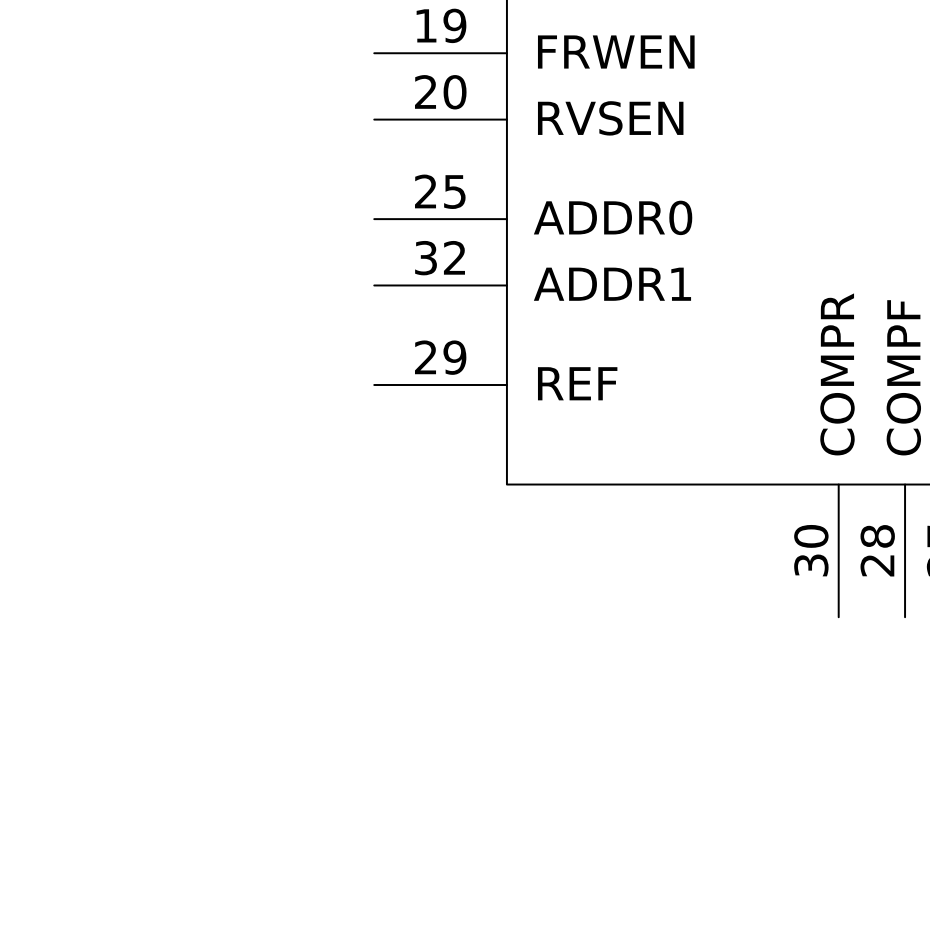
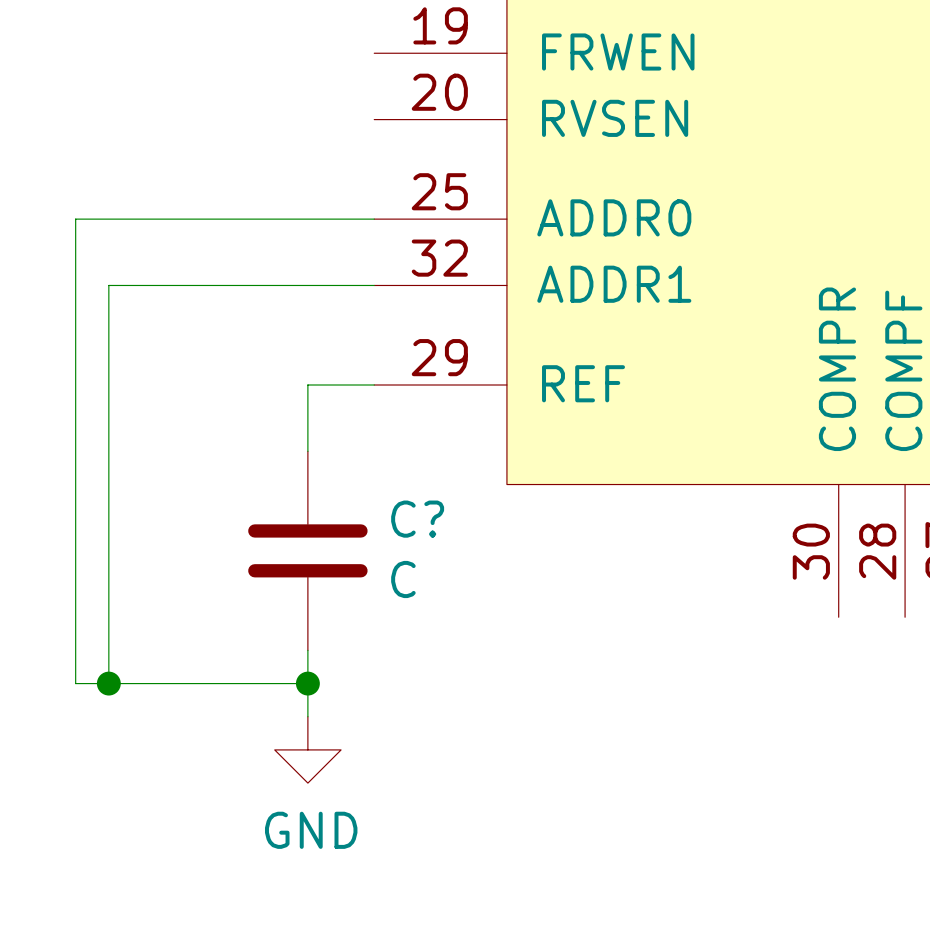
wire: none -> (374, 219) (75, 219) (75, 683) (307, 683)
wire: none -> (374, 285) (108, 285) (108, 683)
wire: none -> (374, 385) (307, 385) (307, 451)
C?: none -> C (307, 550)
wire: none -> (307, 650) (307, 716)
junction: none -> (108, 683)
junction: none -> (307, 683)
power symbol: none -> GND (307, 749)

